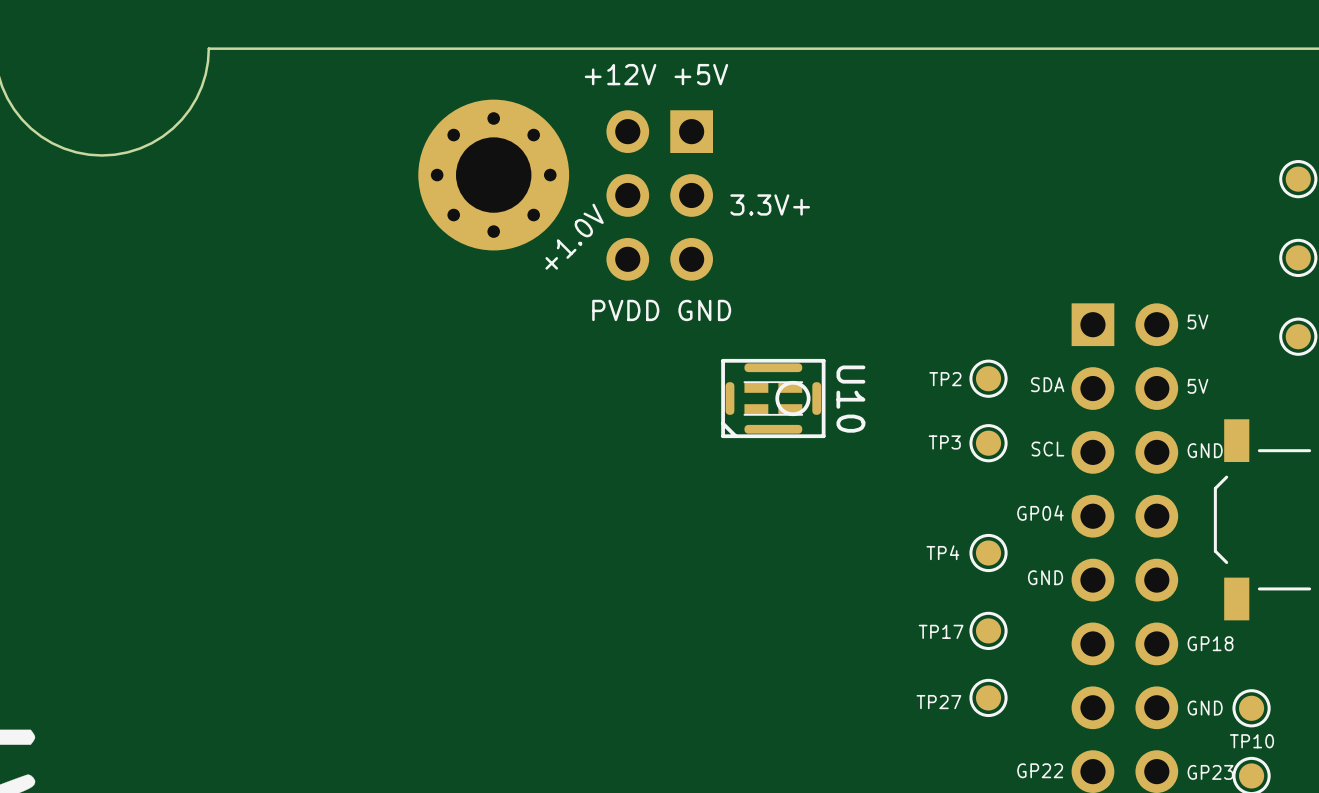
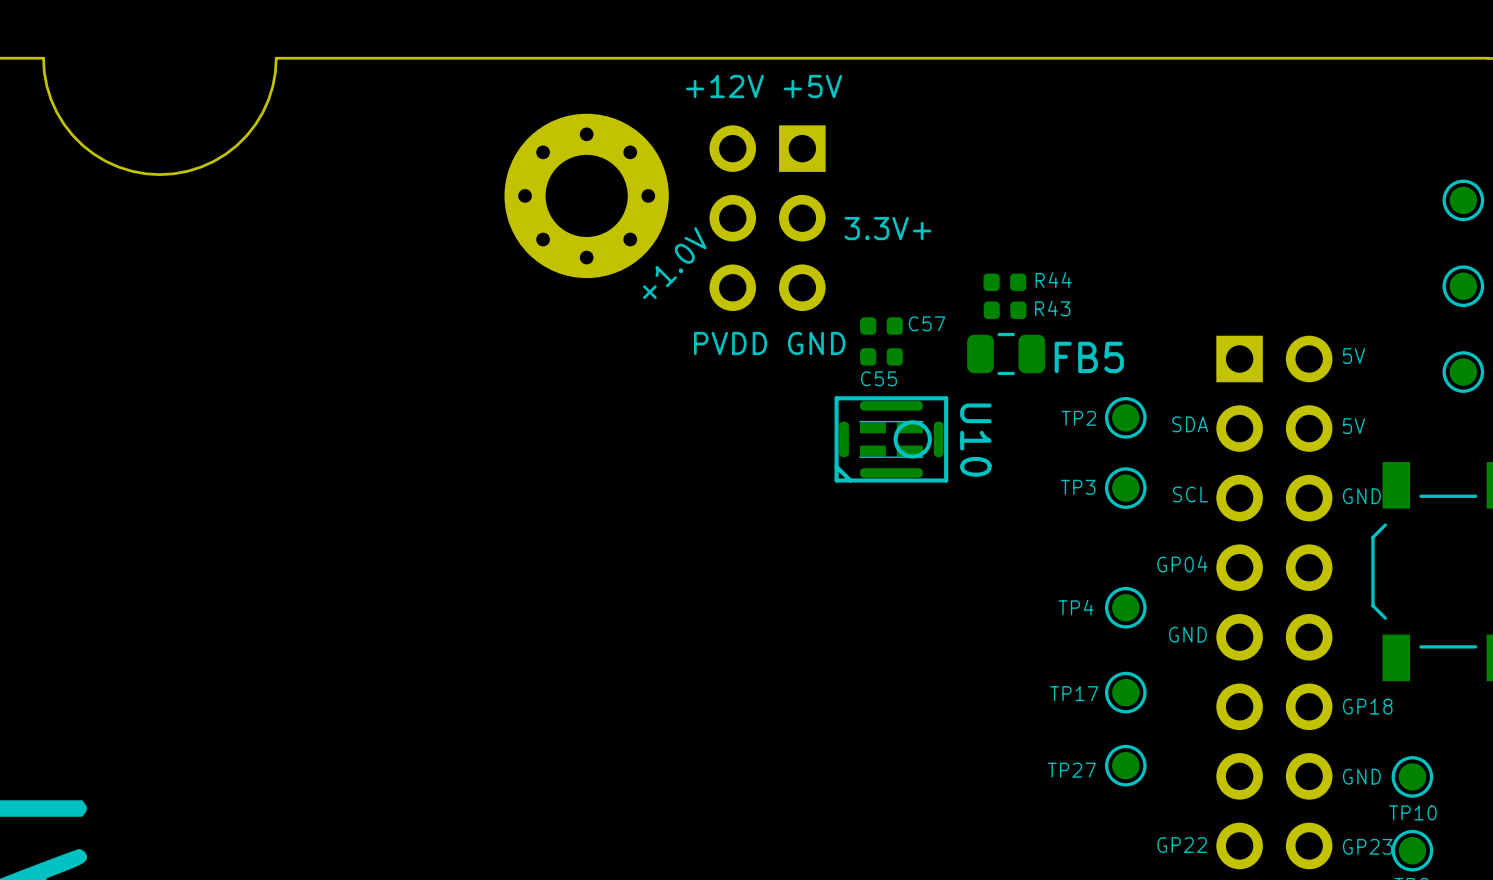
R44: none -> (1004, 282)
R43: none -> (1005, 310)
C57: none -> (881, 326)
FB5: none -> (1006, 353)
C55: none -> (881, 356)

